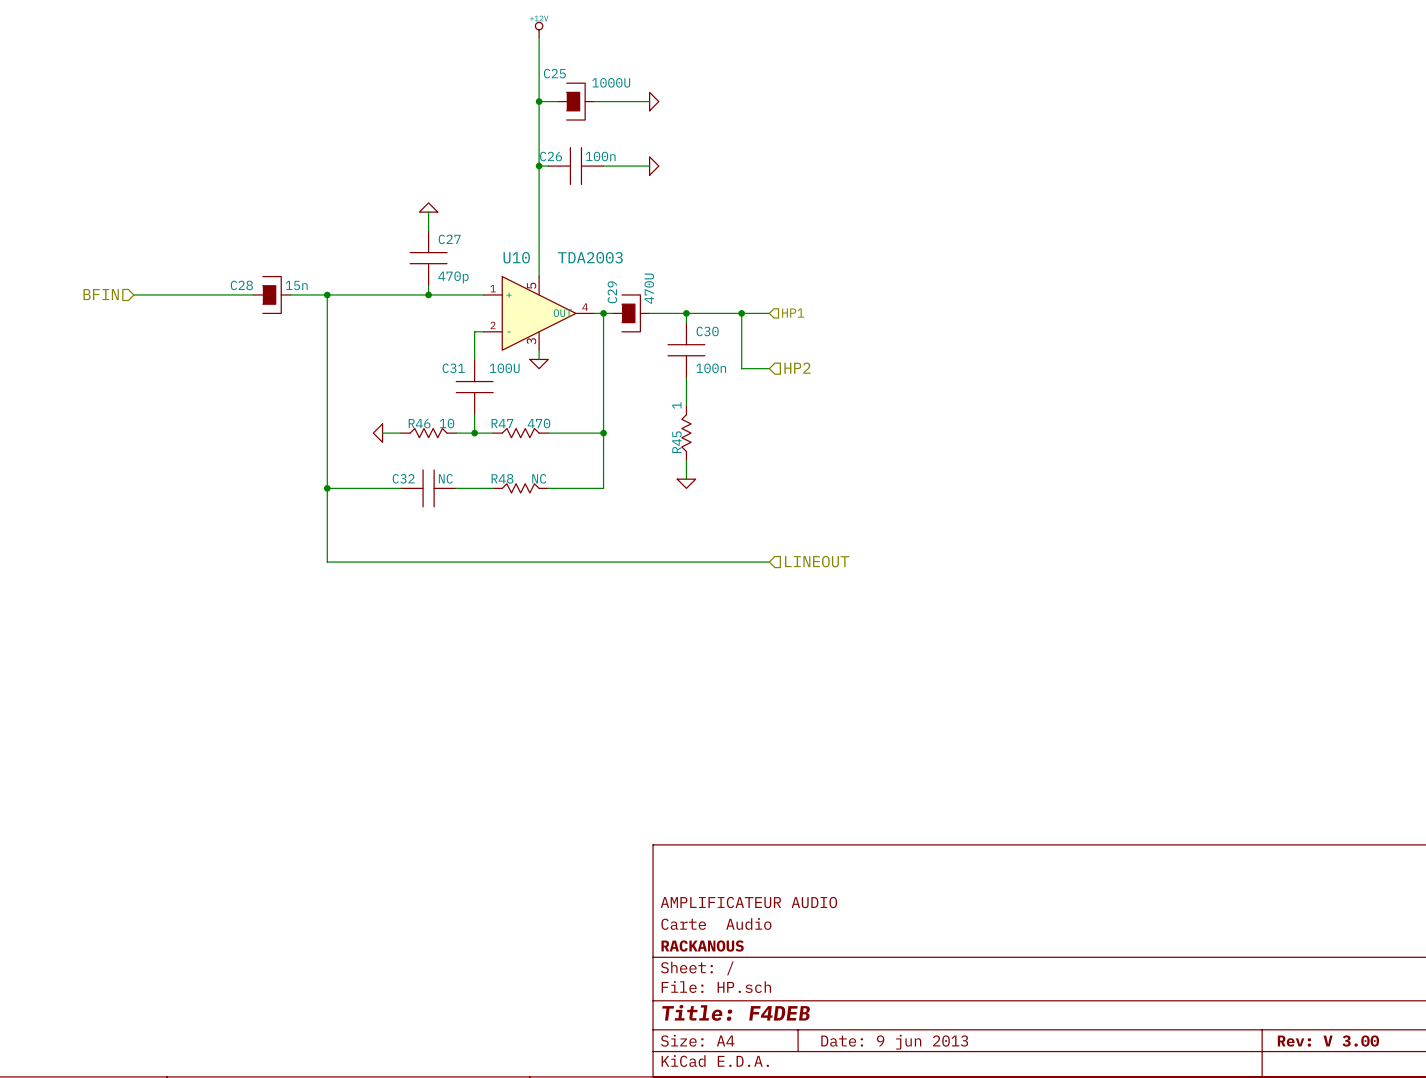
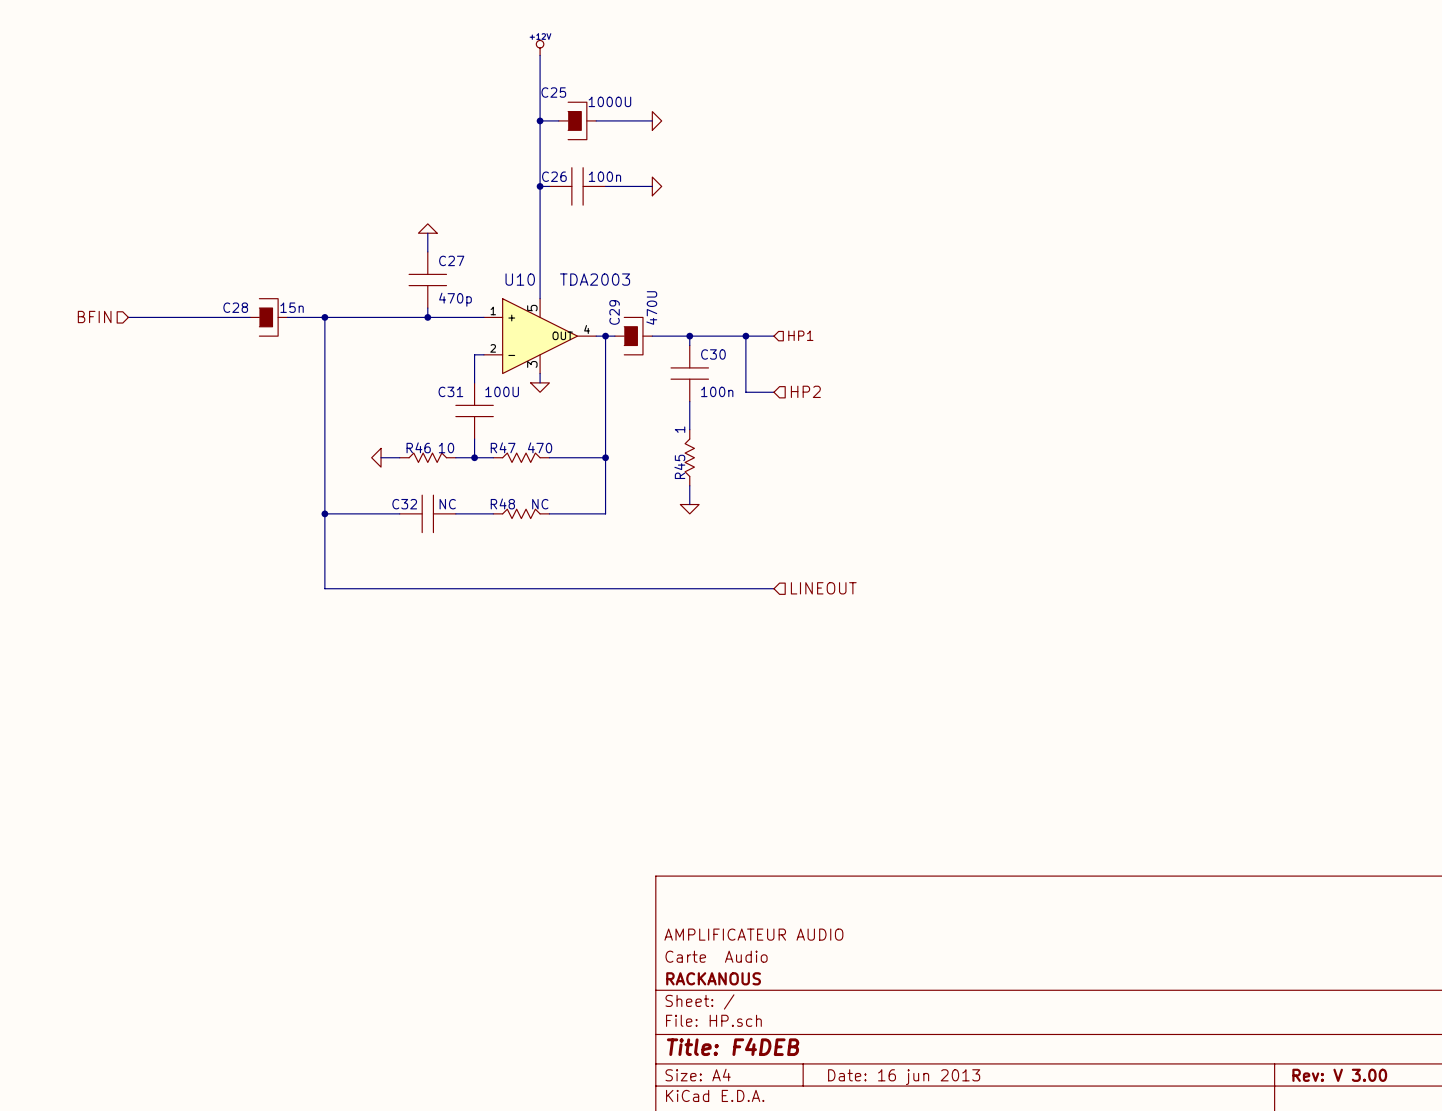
title block: Date: 9 jun 2013 (894, 1042) -> Date: 16 jun 2013 (904, 1077)

